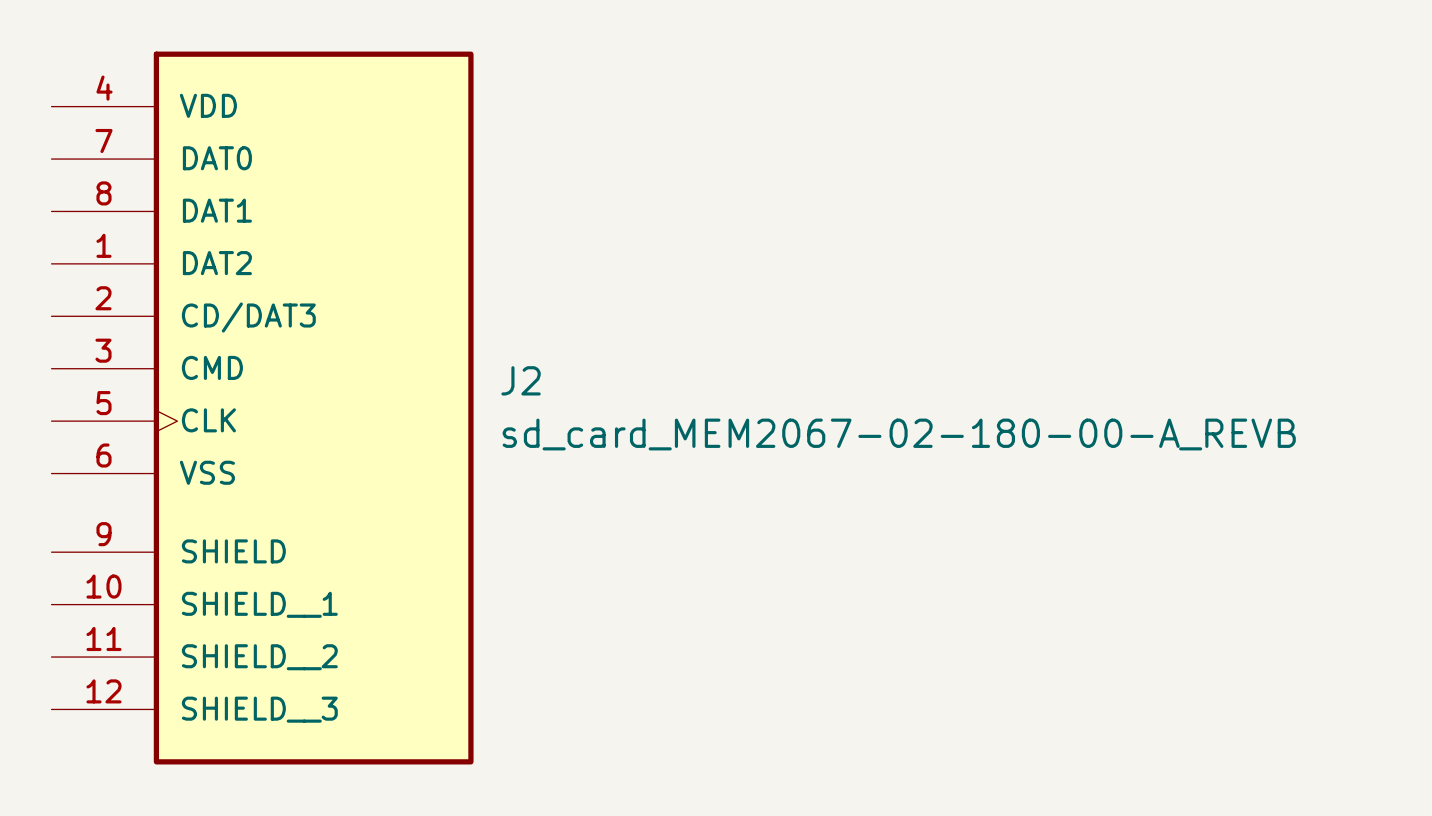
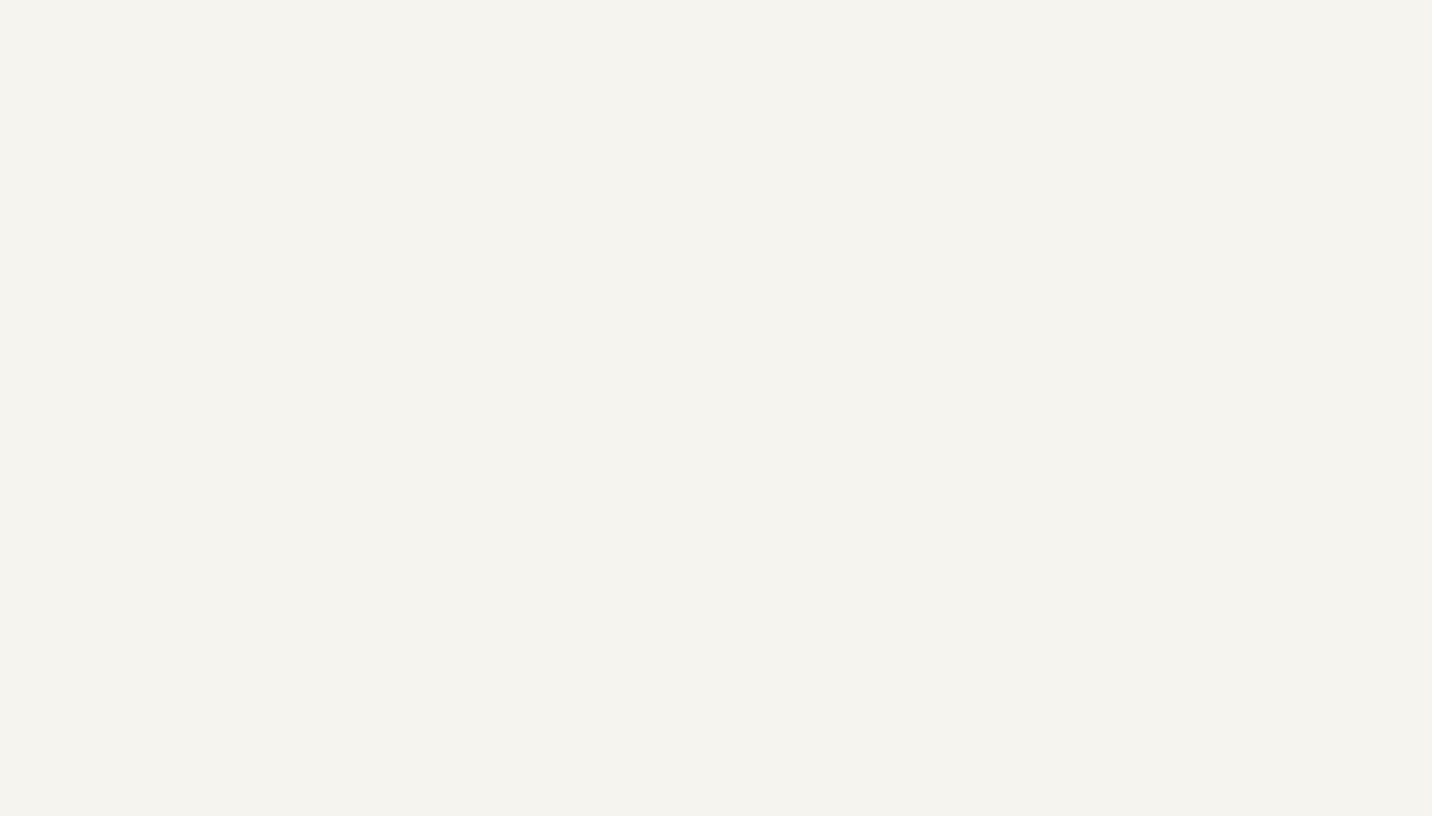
J2: sd_card_MEM2067-02-180-00-A_REVB (262, 408) -> none

